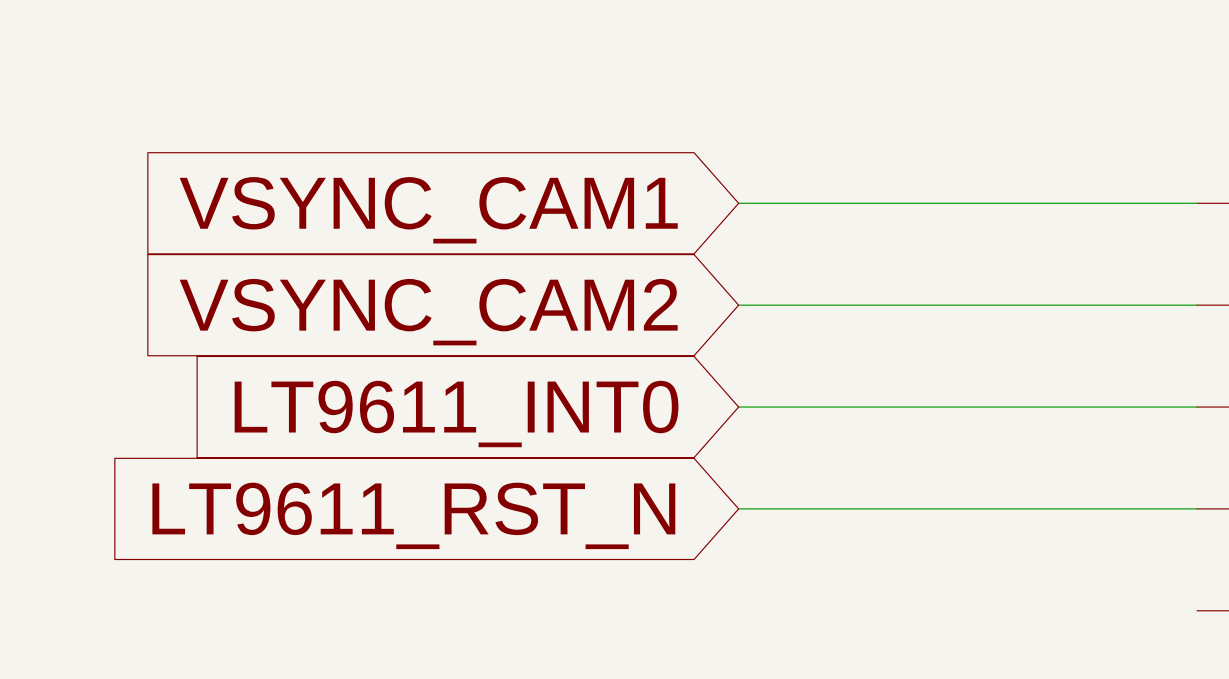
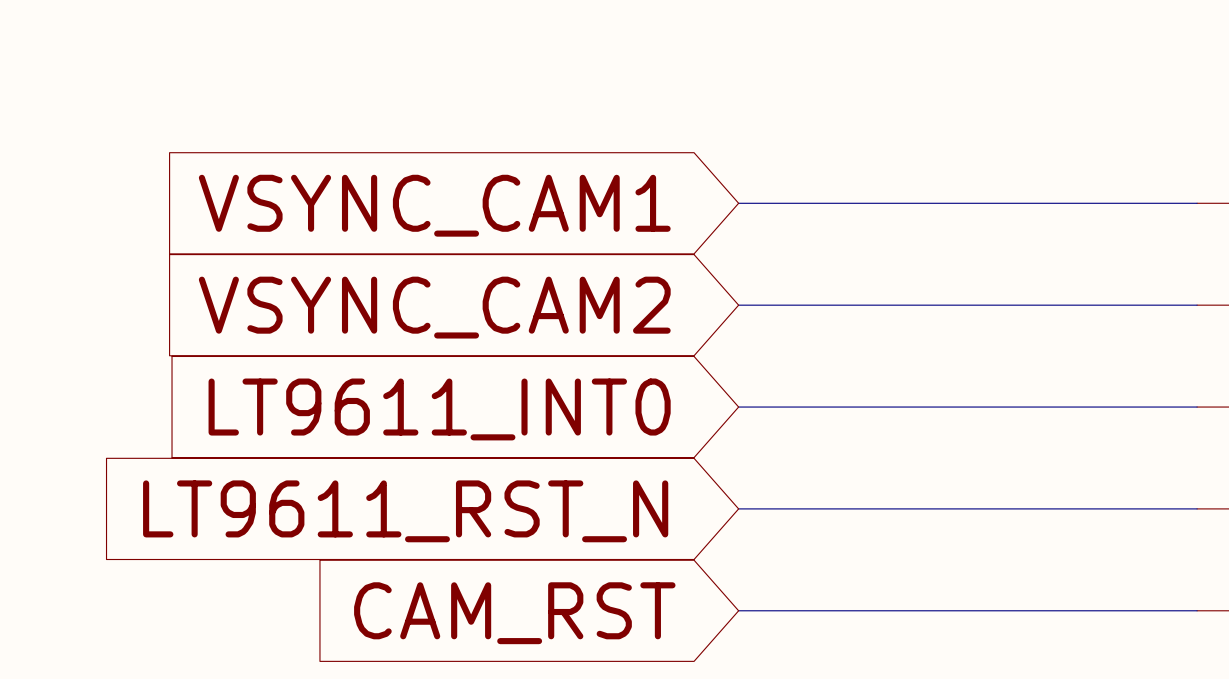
wire: none -> (738, 610) (1197, 610)
global label: none -> CAM_RST (514, 613)

